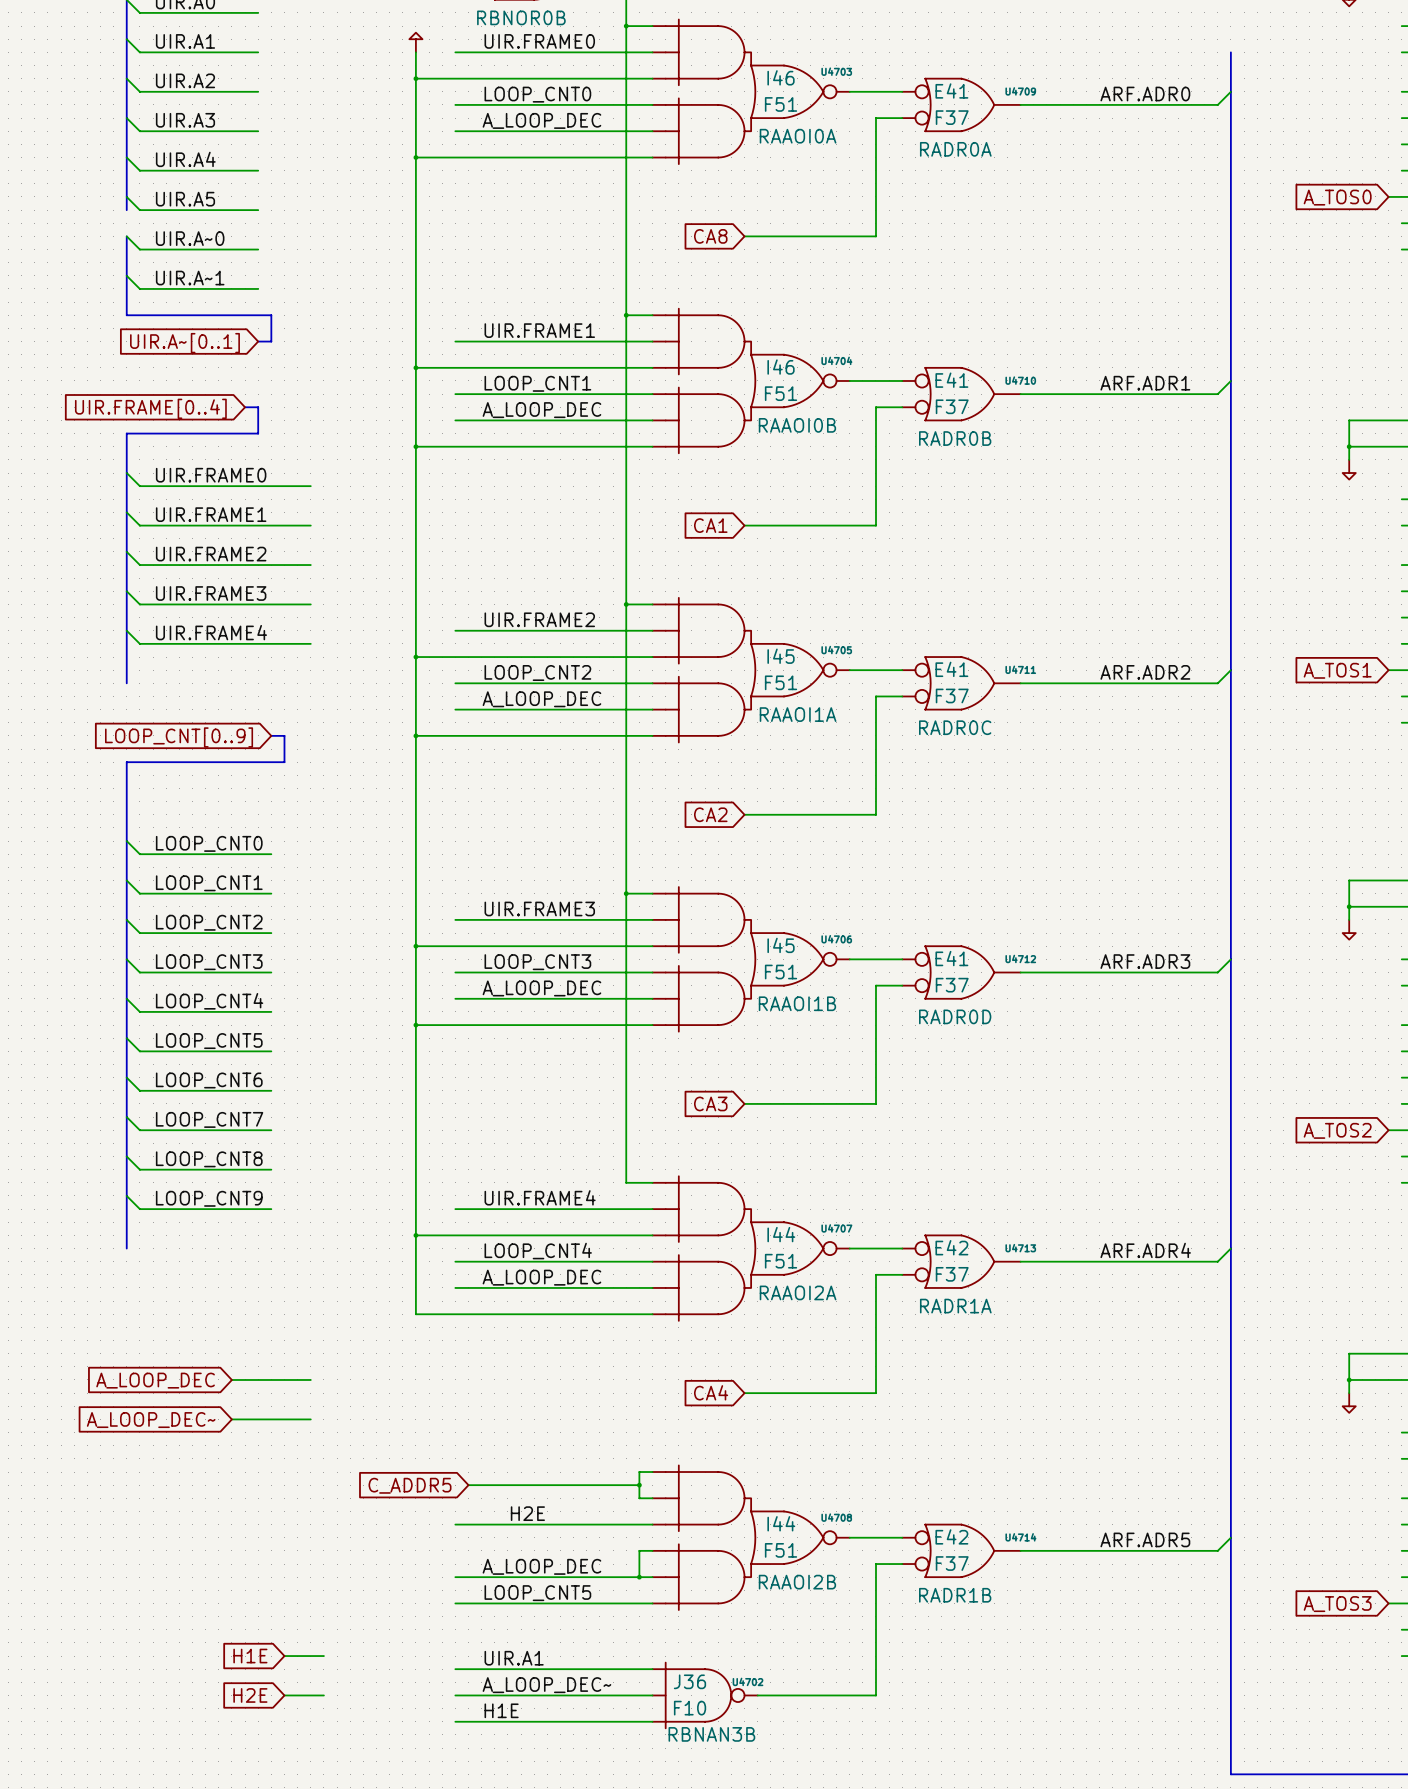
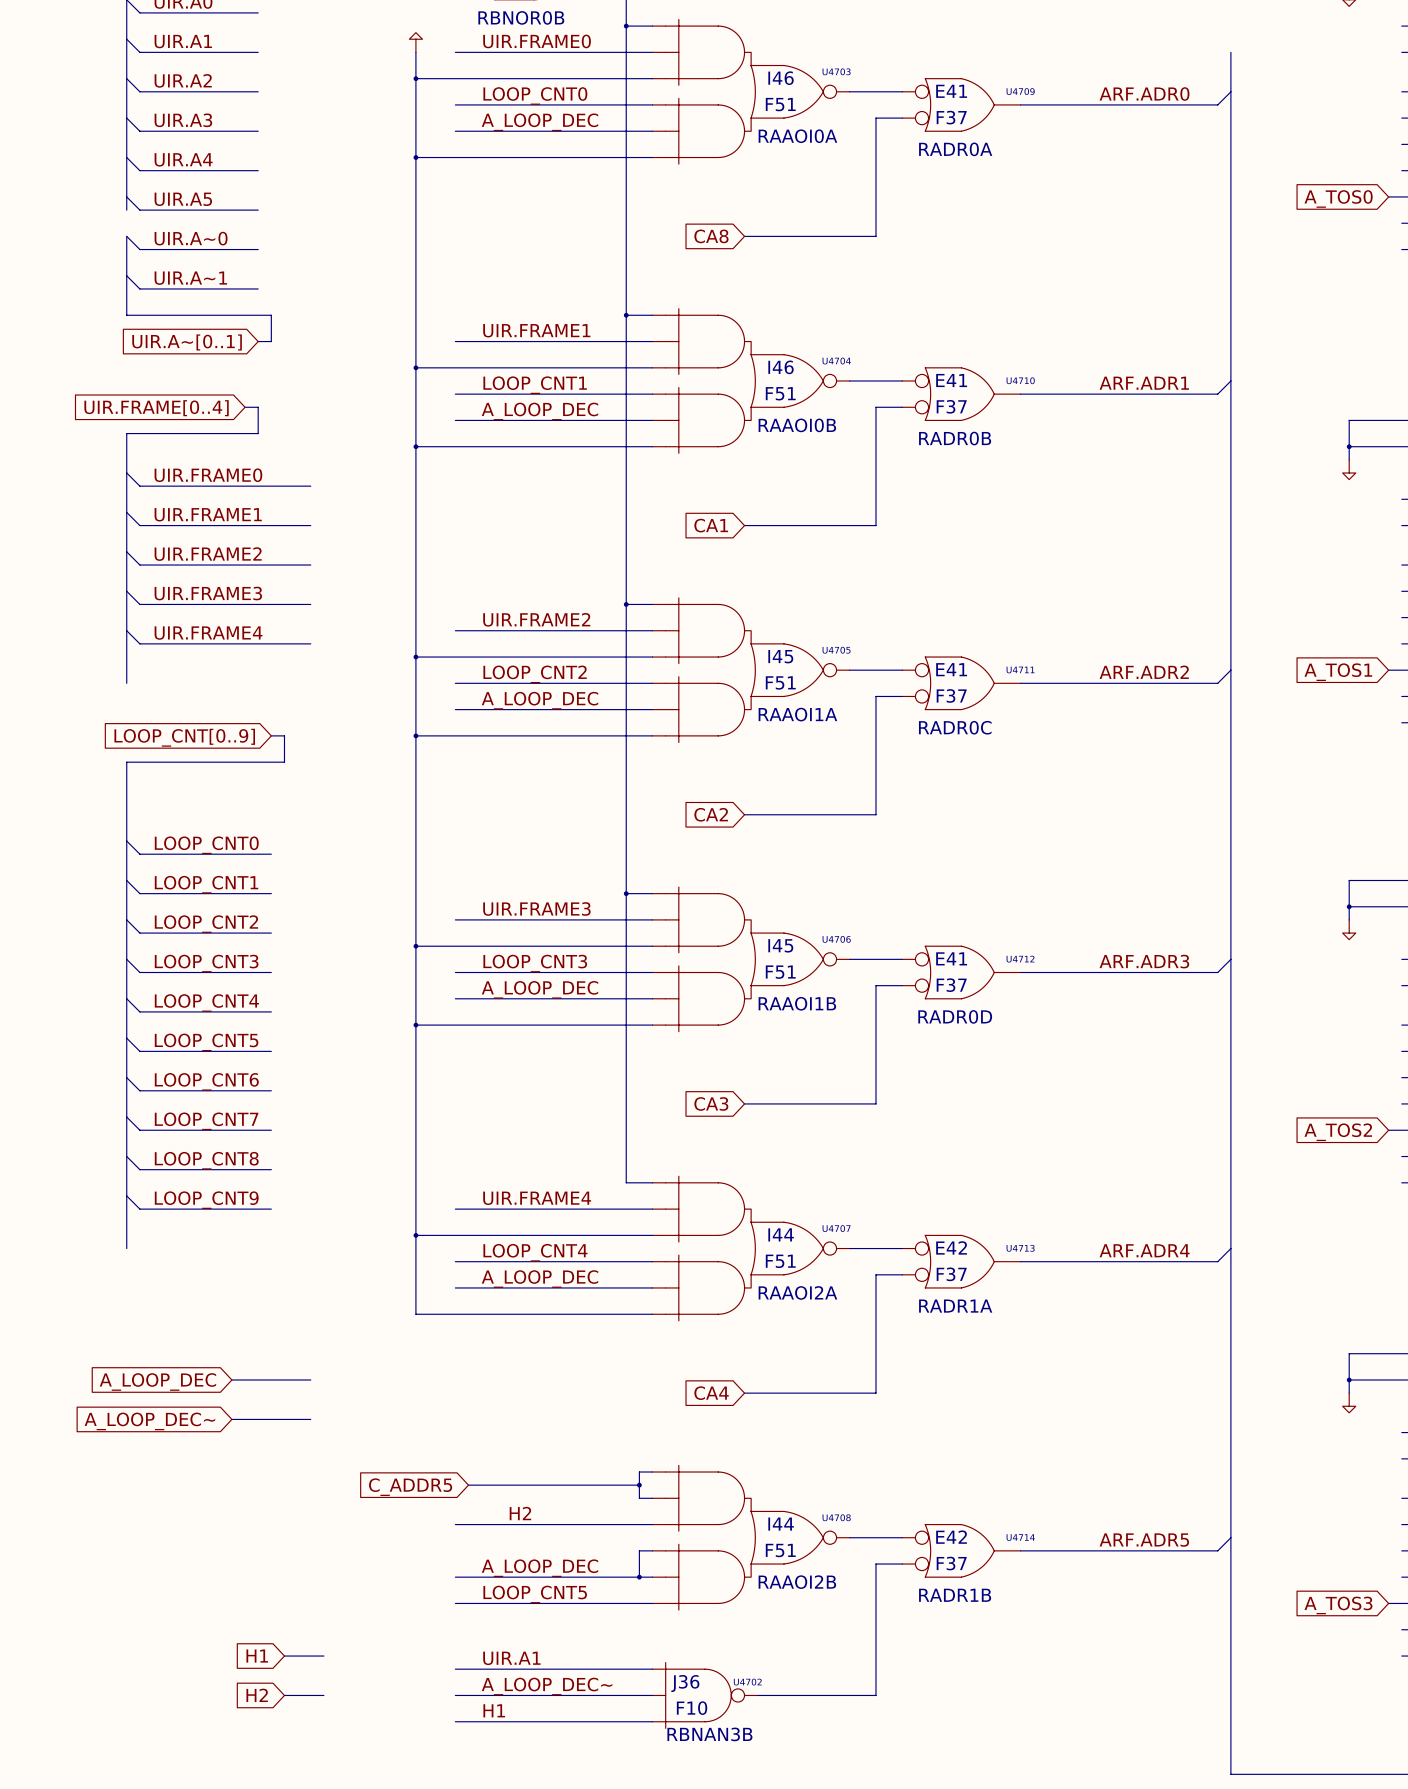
label: H2E (527, 1513) -> H2 (520, 1513)
global label: H1E (250, 1656) -> H1 (257, 1656)
global label: H2E (250, 1695) -> H2 (257, 1695)
label: H1E (501, 1710) -> H1 (494, 1710)

